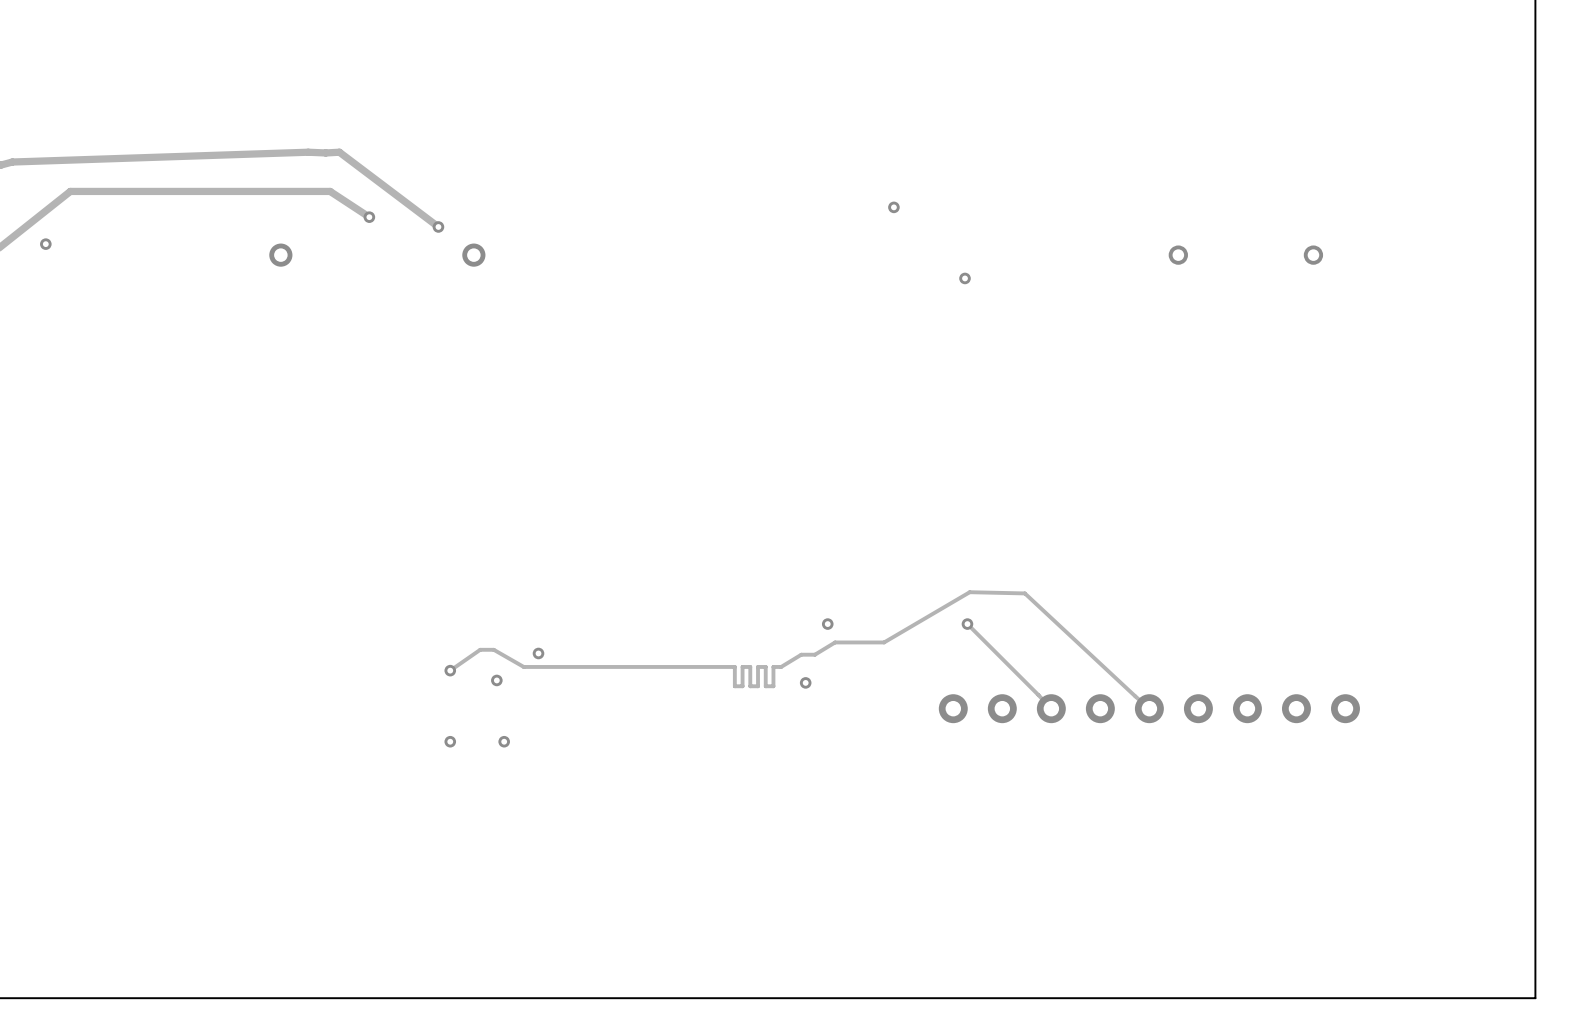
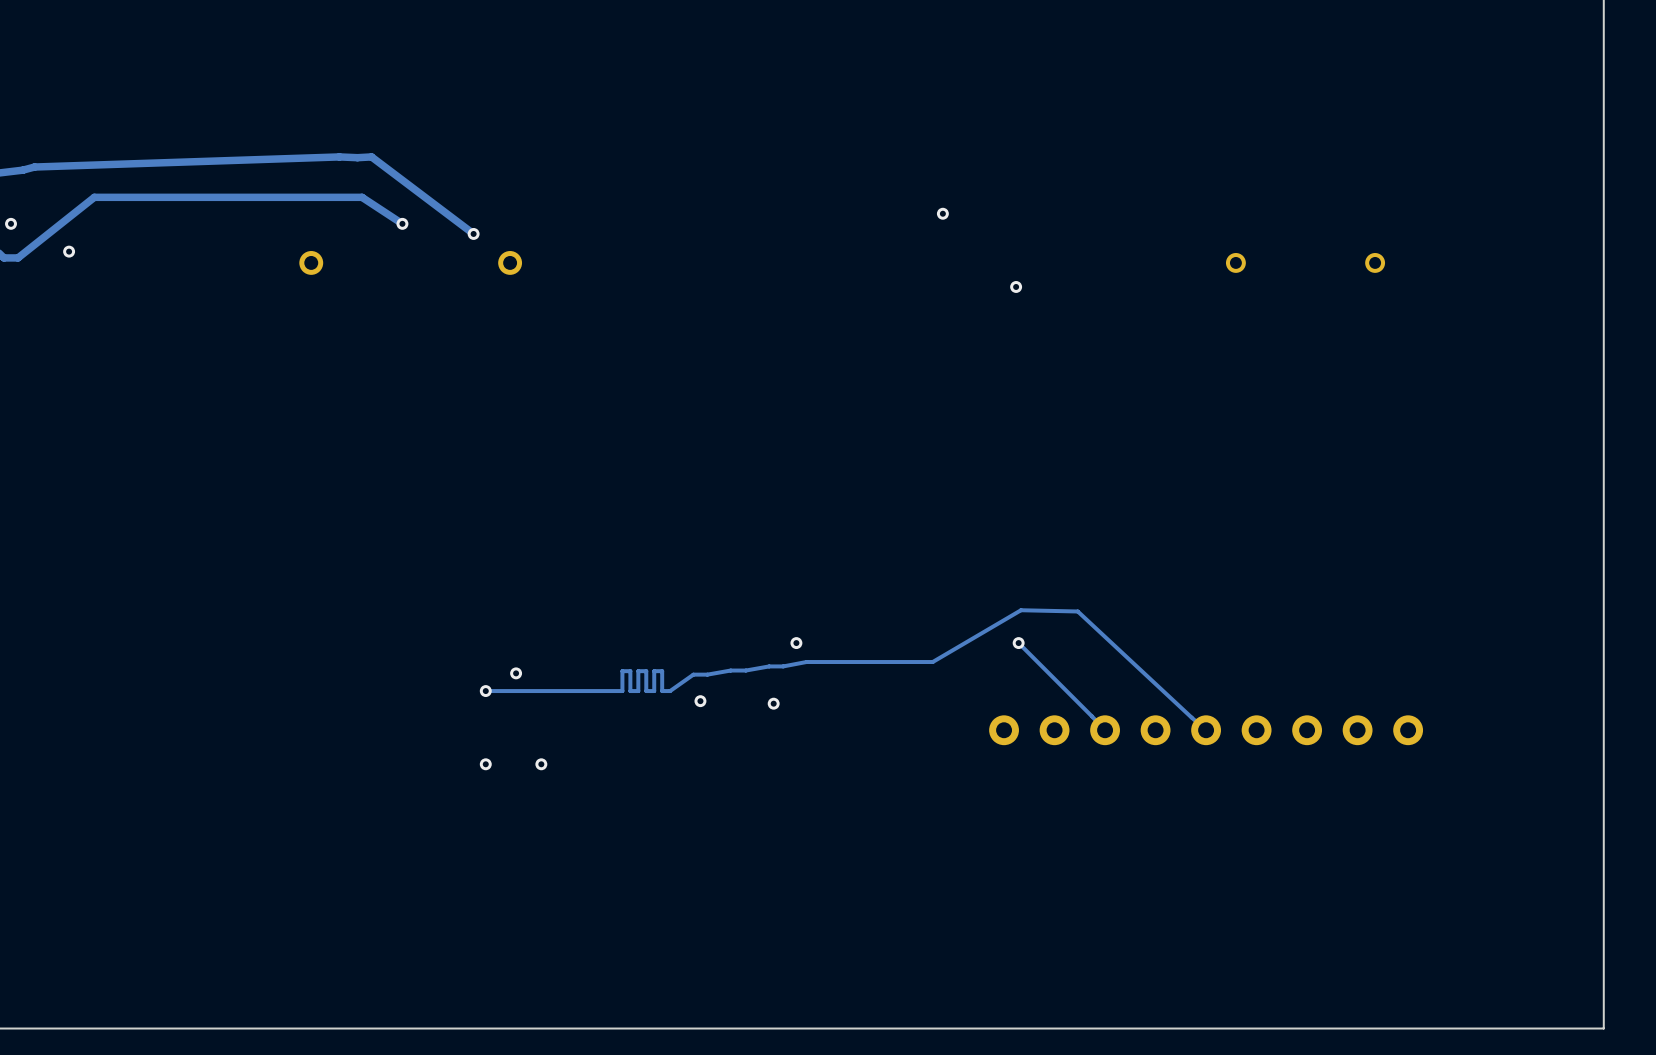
via: none -> (796, 643)
via: (827, 624) -> none
track: (835, 642) (814, 654) (801, 654) (781, 666) (773, 666) (773, 686) (765, 686) (765, 666) (758, 666) (758, 686) (750, 686) (750, 666) (742, 666) (742, 686) (734, 686) (734, 666) (523, 666) (493, 649) (480, 649) (450, 670) -> (882, 662) (806, 662) (783, 666) (693, 674) (670, 691) (662, 691) (662, 671) (654, 671) (654, 691) (646, 691) (646, 671) (638, 671) (638, 691) (630, 691) (630, 671) (622, 671) (622, 691) (485, 691)
via: none -> (516, 673)
via: (538, 653) -> none
via: (496, 680) -> none
via: none -> (700, 701)
via: none -> (773, 703)
via: (805, 682) -> none

